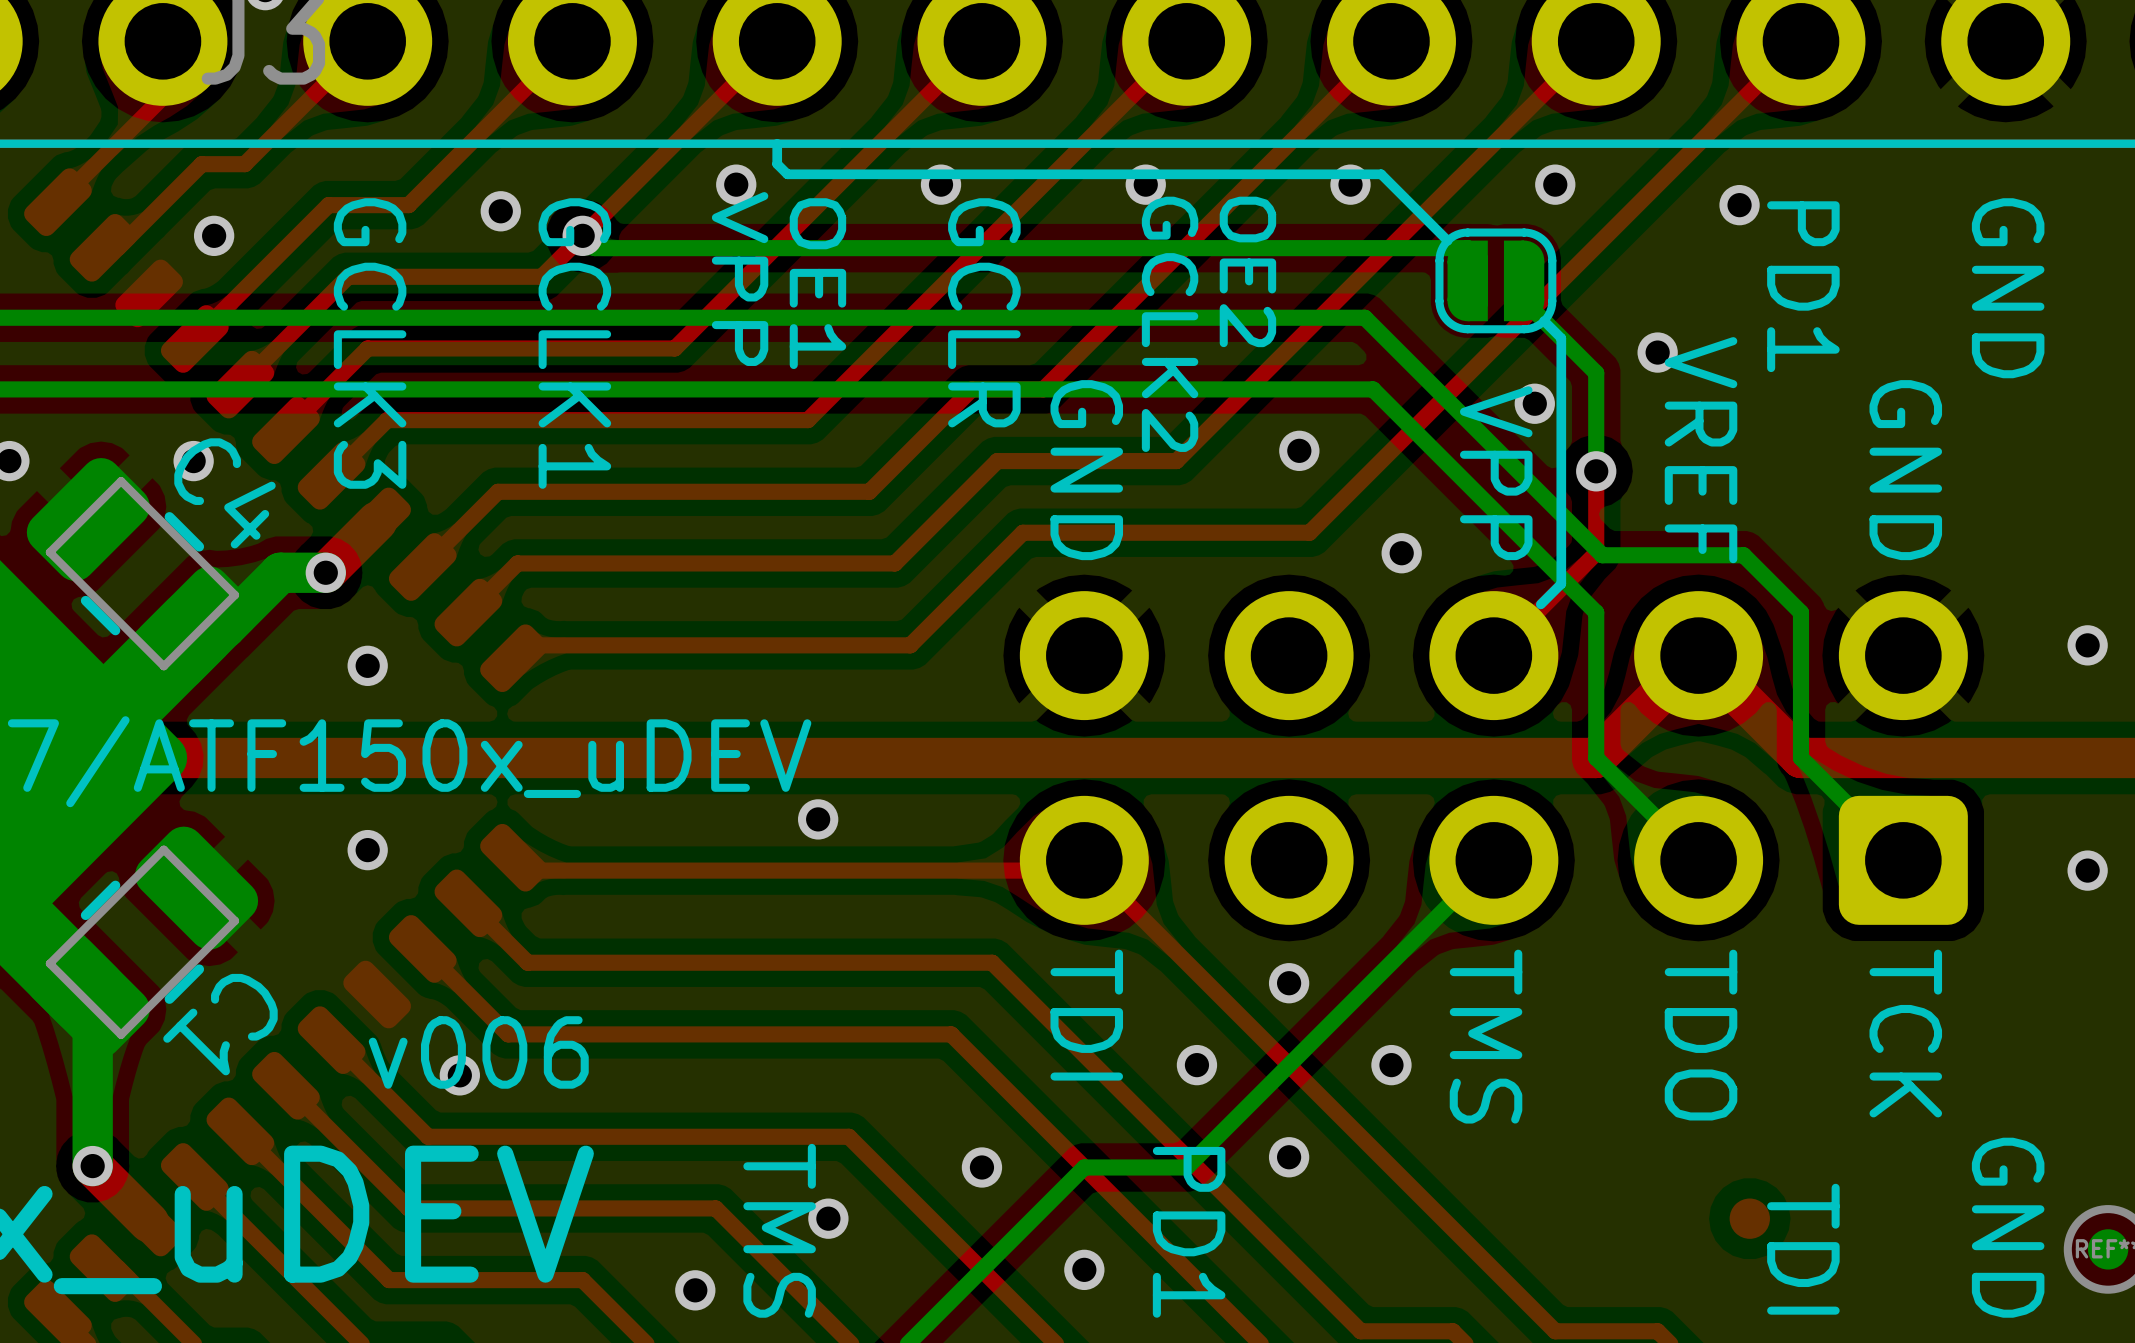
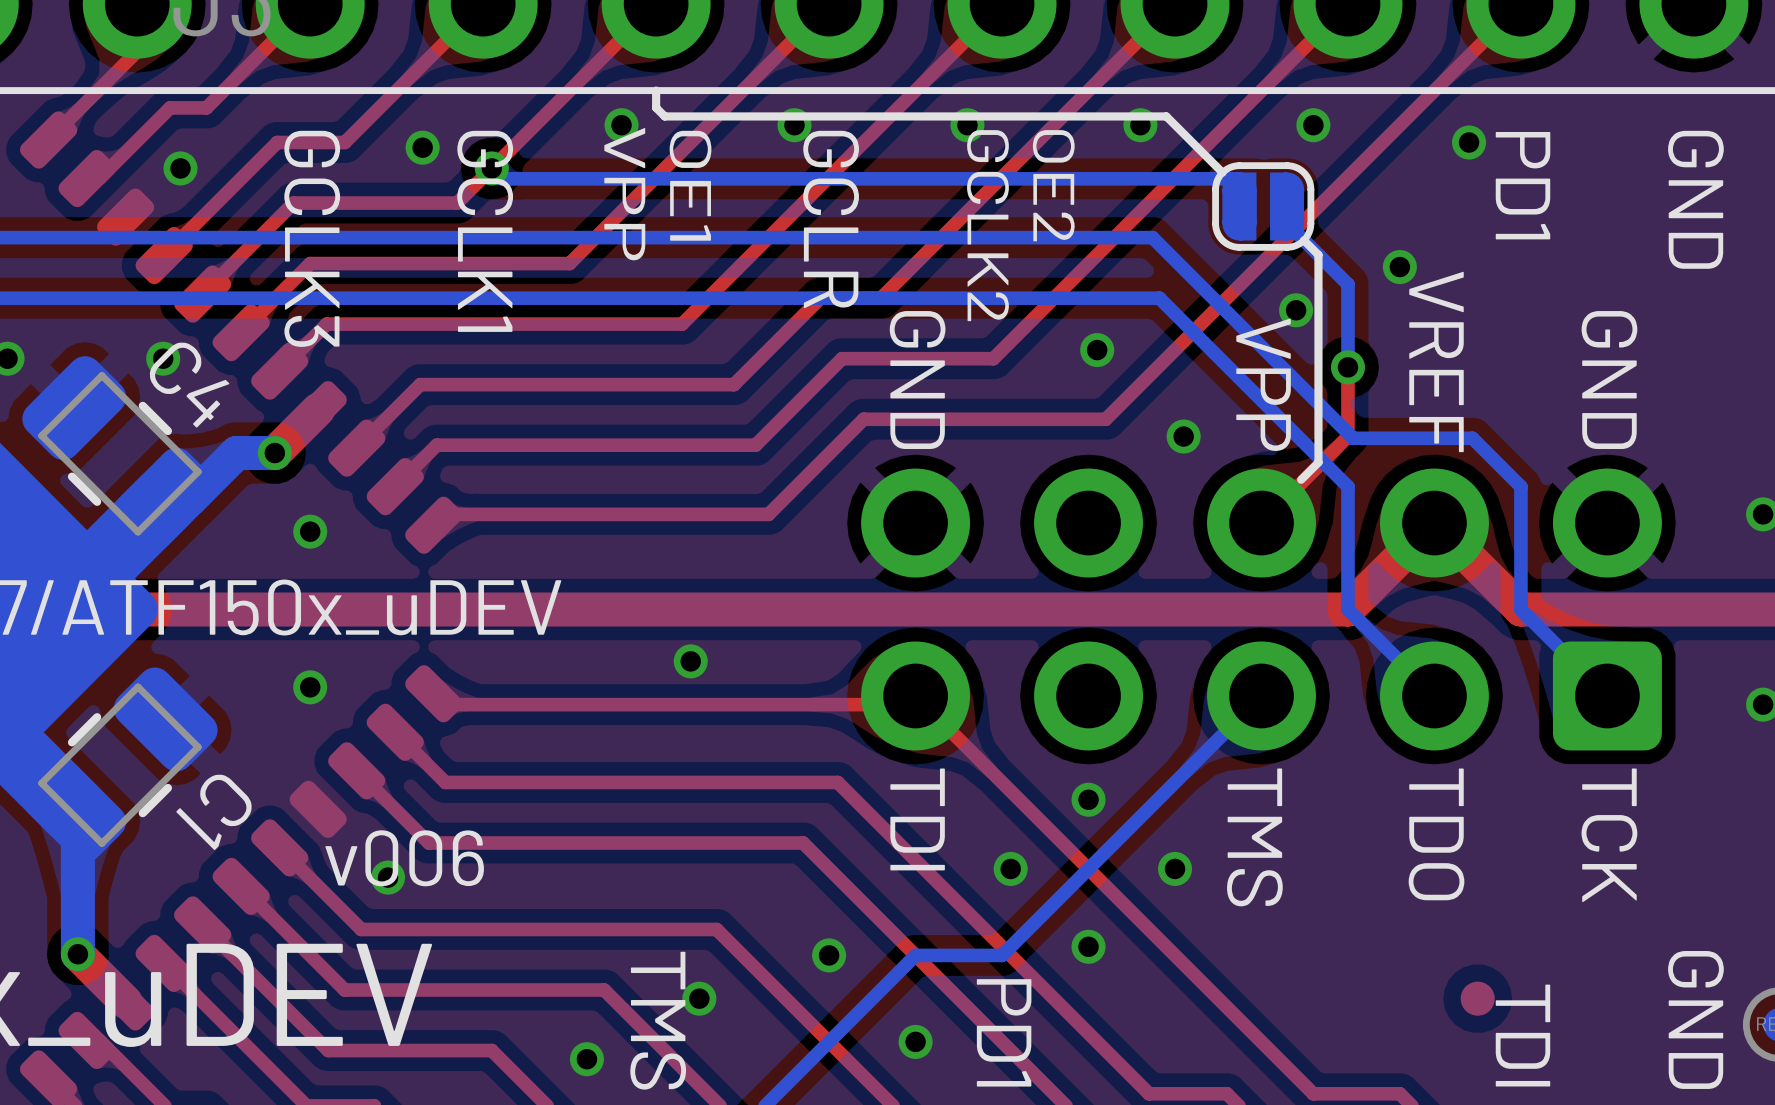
C1 name position: C1 (220, 1024) -> C1 (214, 812)

